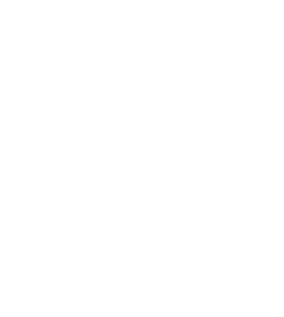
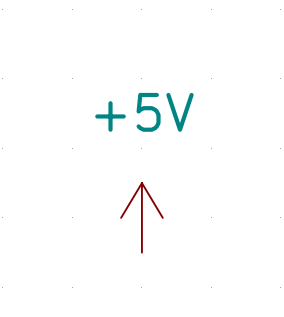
power symbol: none -> +5V (141, 217)

